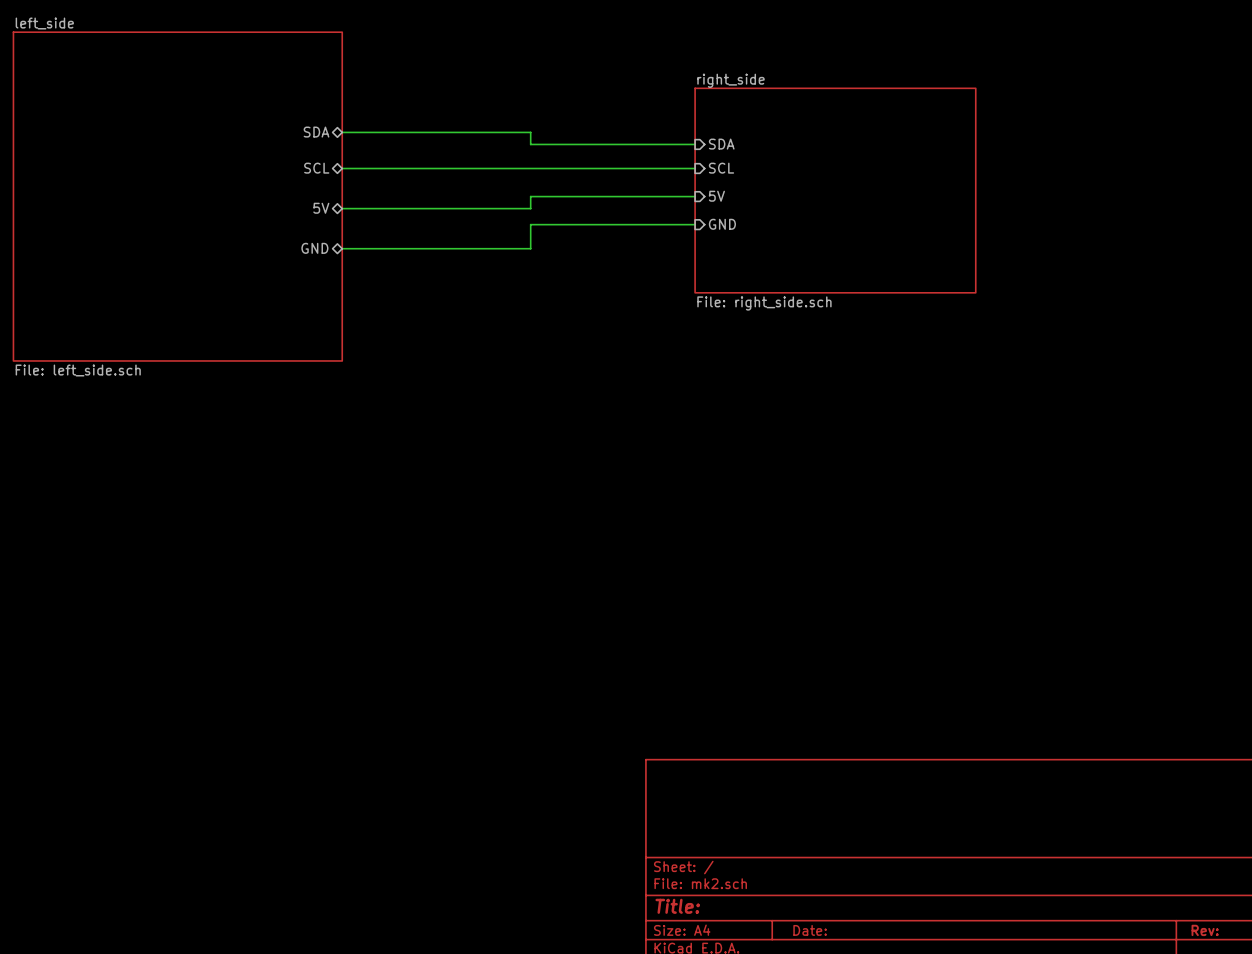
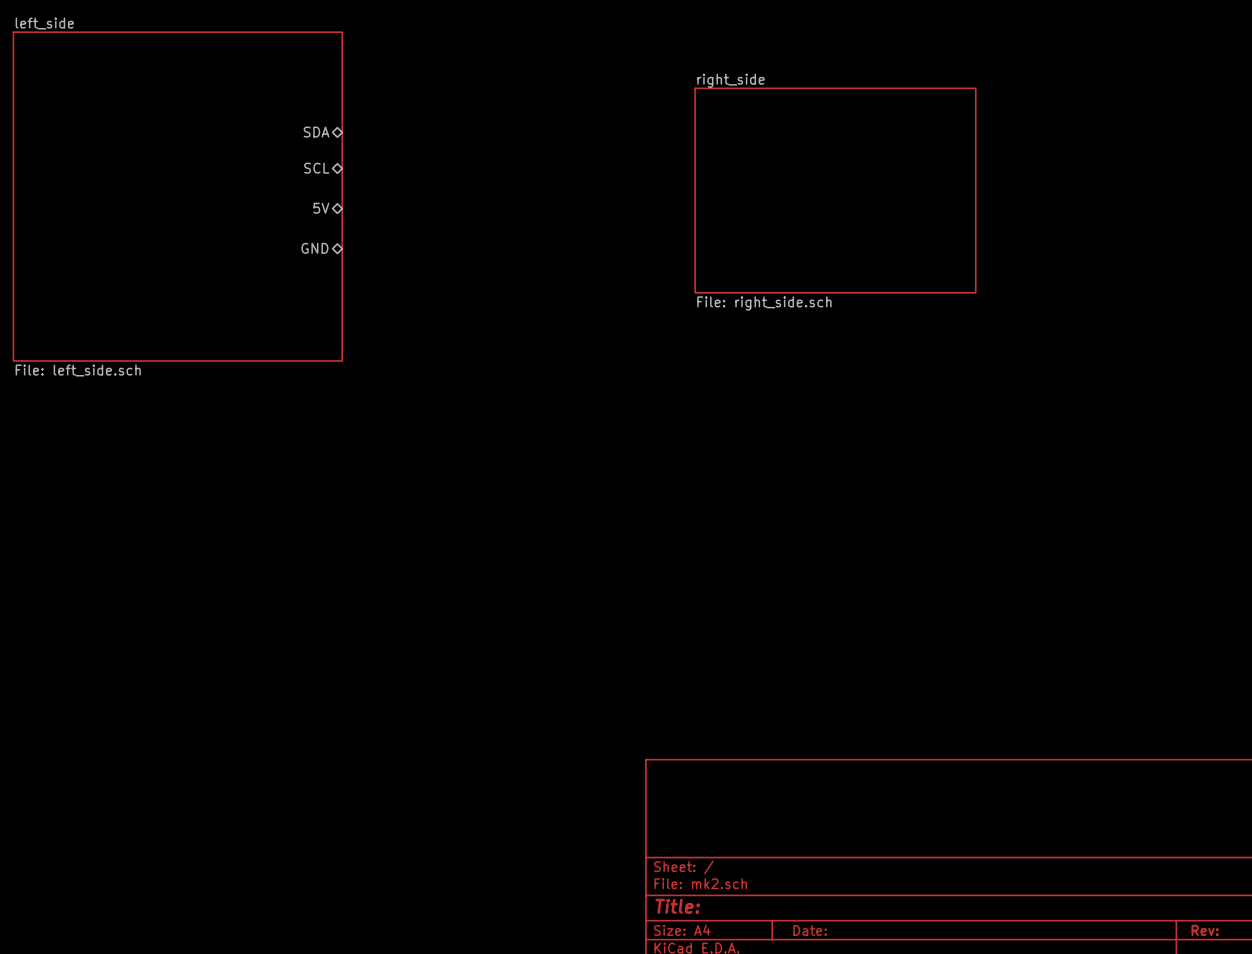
wire: (342, 132) (530, 132) (530, 144) (695, 144) -> none
sheet pin: SDA (721, 144) -> none
wire: (342, 168) (695, 168) -> none
sheet pin: SCL (721, 168) -> none
wire: (695, 196) (530, 196) (530, 208) (342, 208) -> none
sheet pin: 5V (716, 196) -> none
wire: (695, 224) (530, 224) (530, 248) (342, 248) -> none
sheet pin: GND (722, 224) -> none

